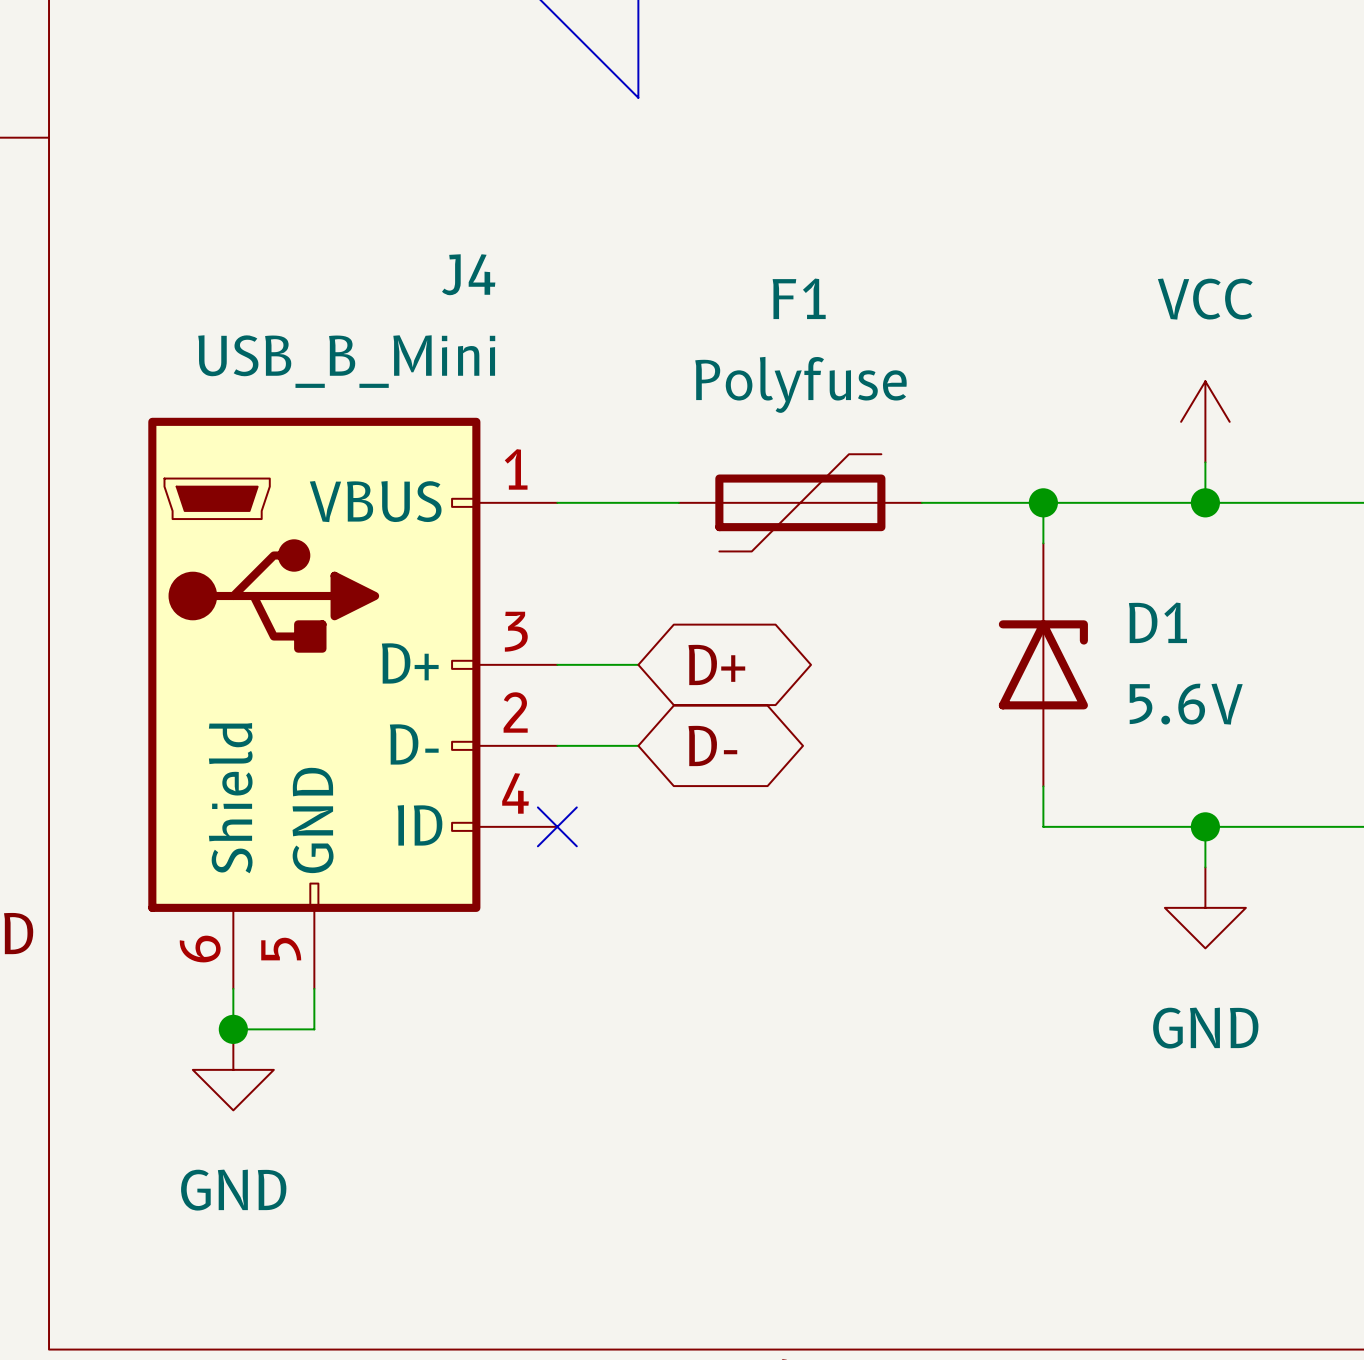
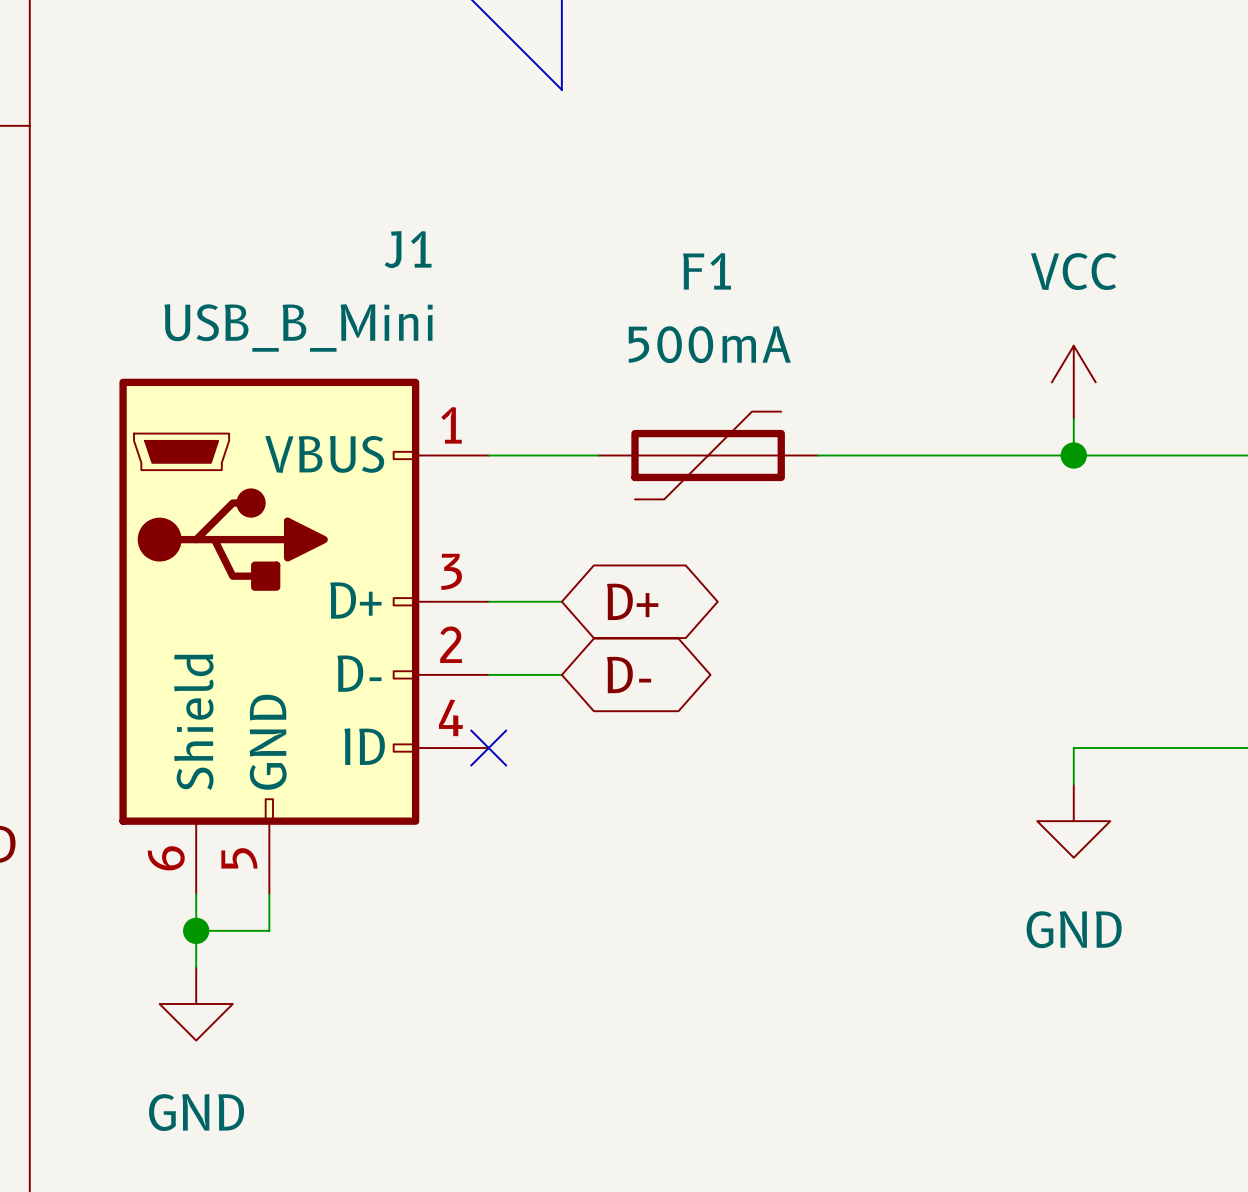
J4 name: J4 (468, 274) -> J1 (408, 249)
F1 value: Polyfuse (800, 384) -> 500mA (709, 344)
wire: (1043, 502) (1043, 543) -> none
junction: (1043, 502) -> none
D1: 5.6V (1043, 664) -> none
wire: (1043, 786) (1043, 826) (1205, 826) -> none
junction: (1205, 826) -> none
power symbol position: GND (233, 1069) -> GND (196, 1003)

